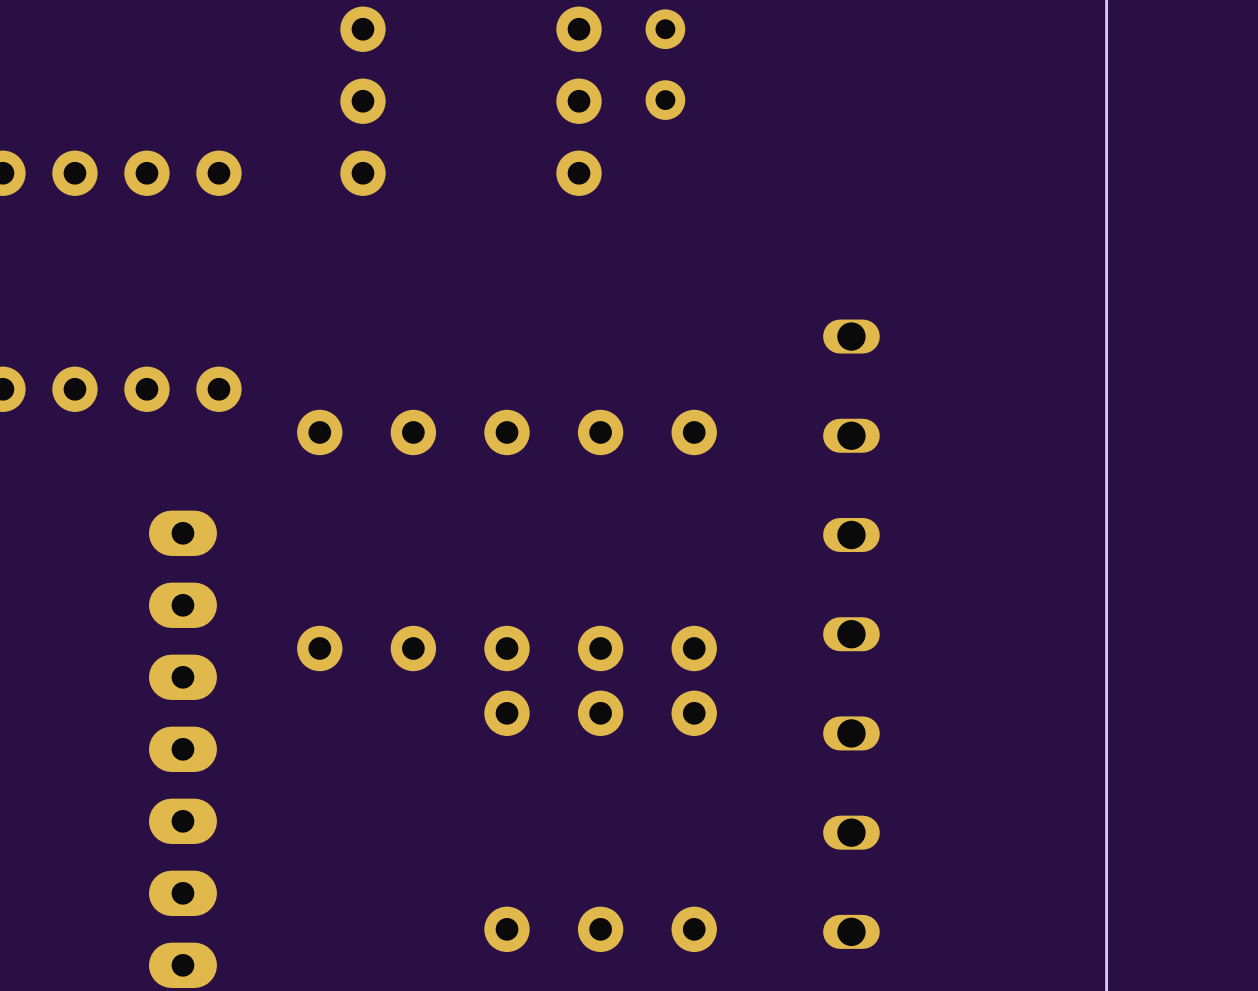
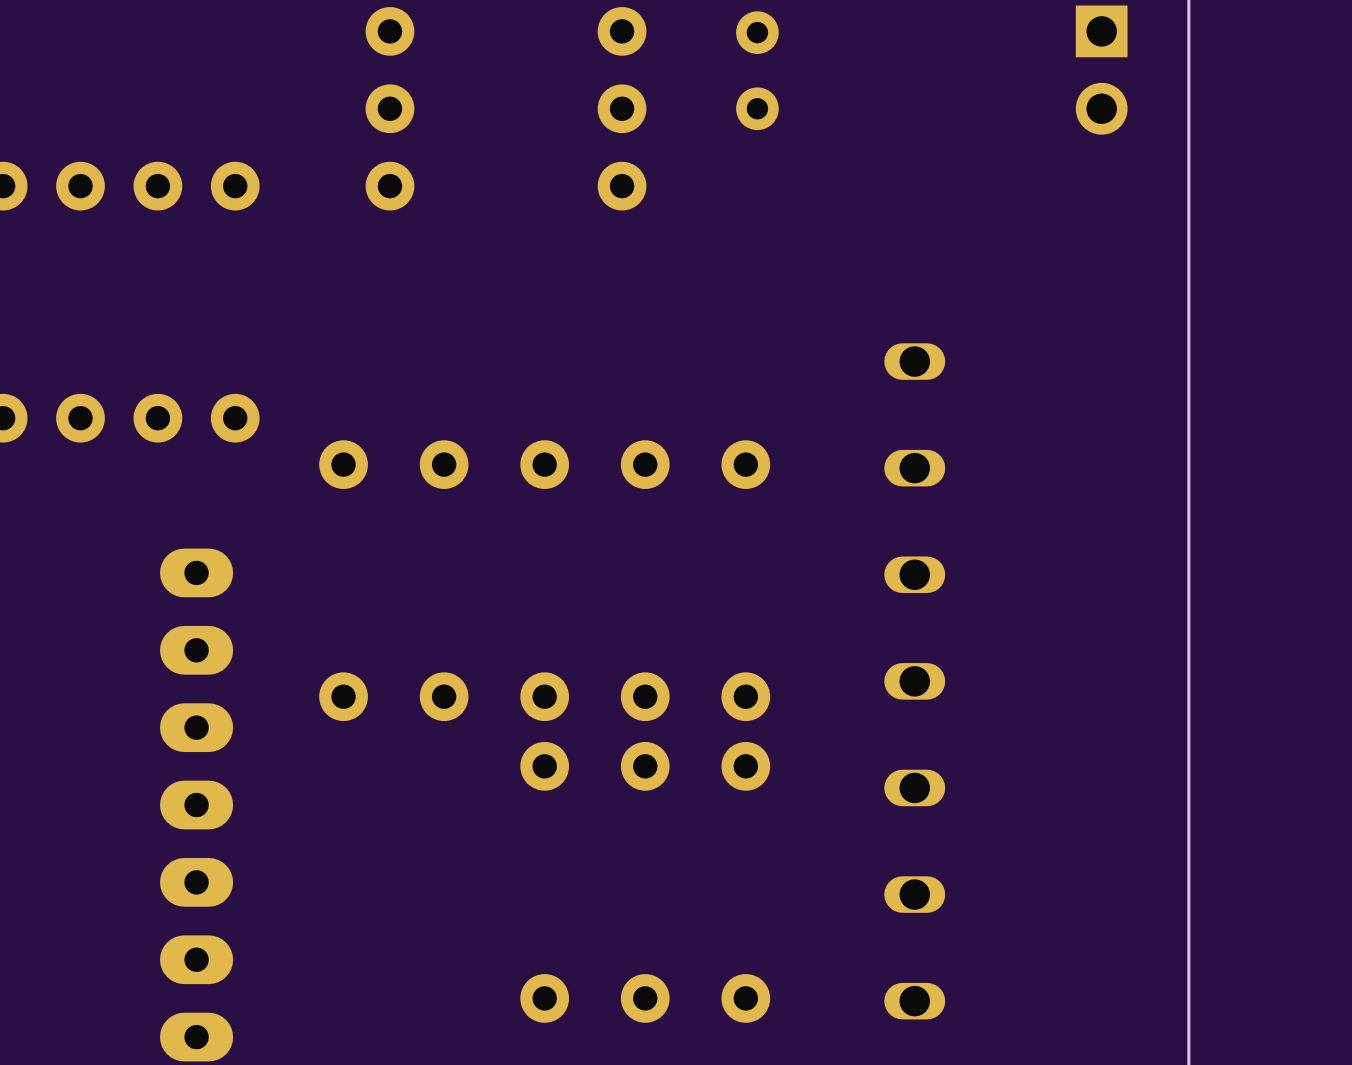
part position: (665, 64) -> (757, 70)
part: none -> (1101, 70)

